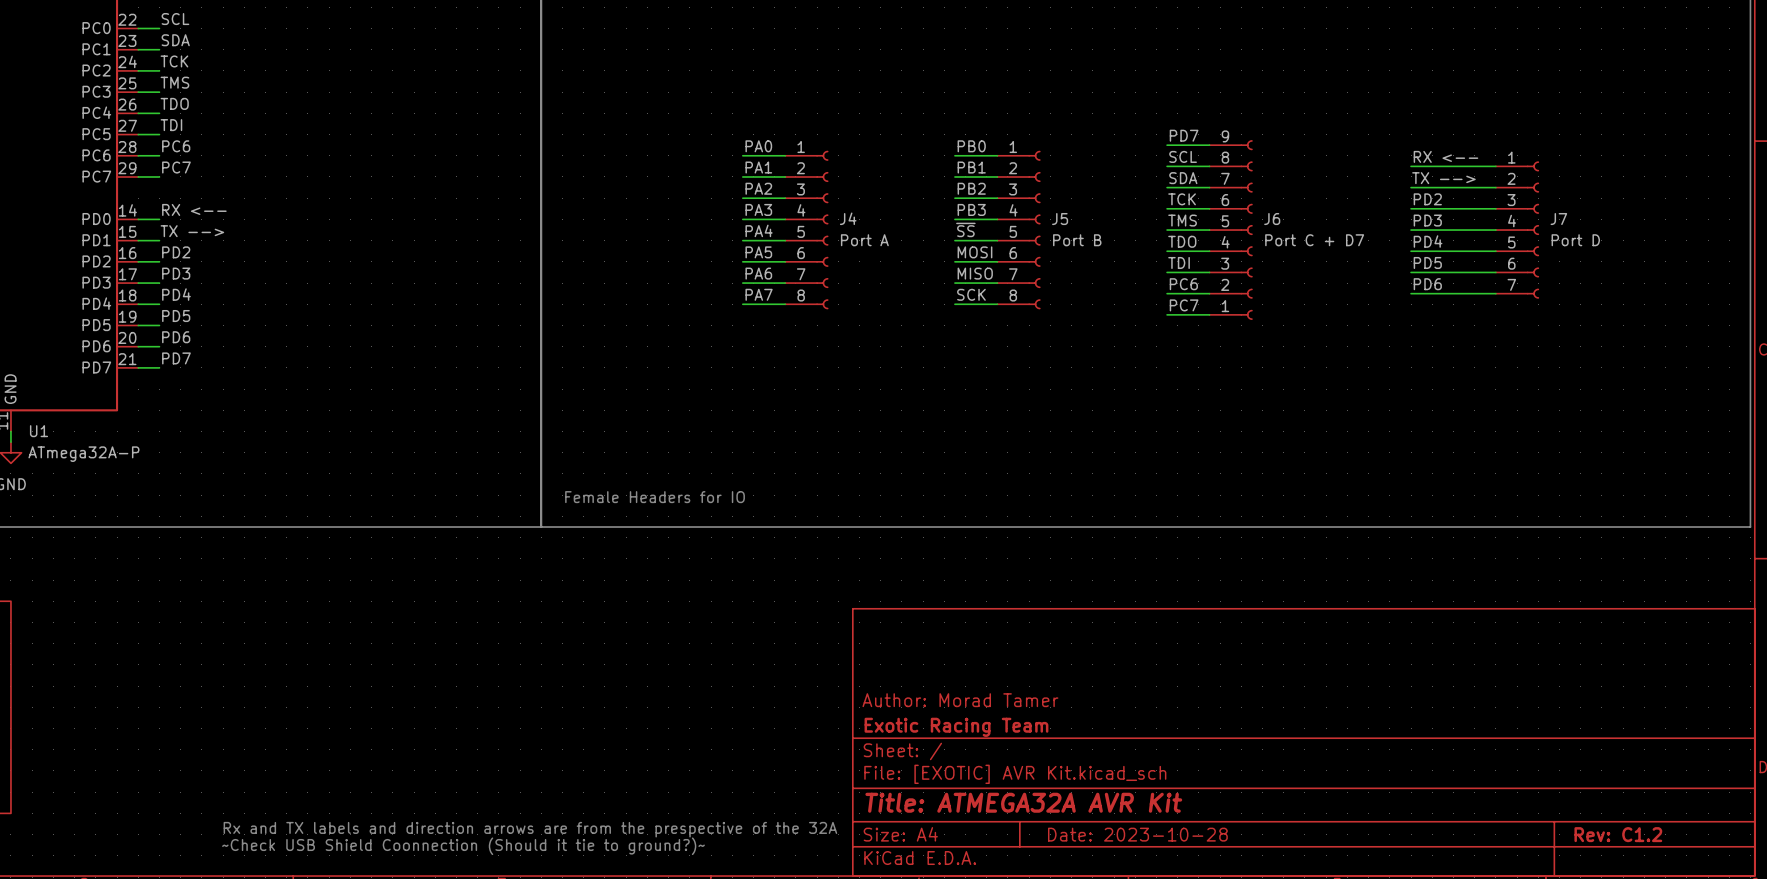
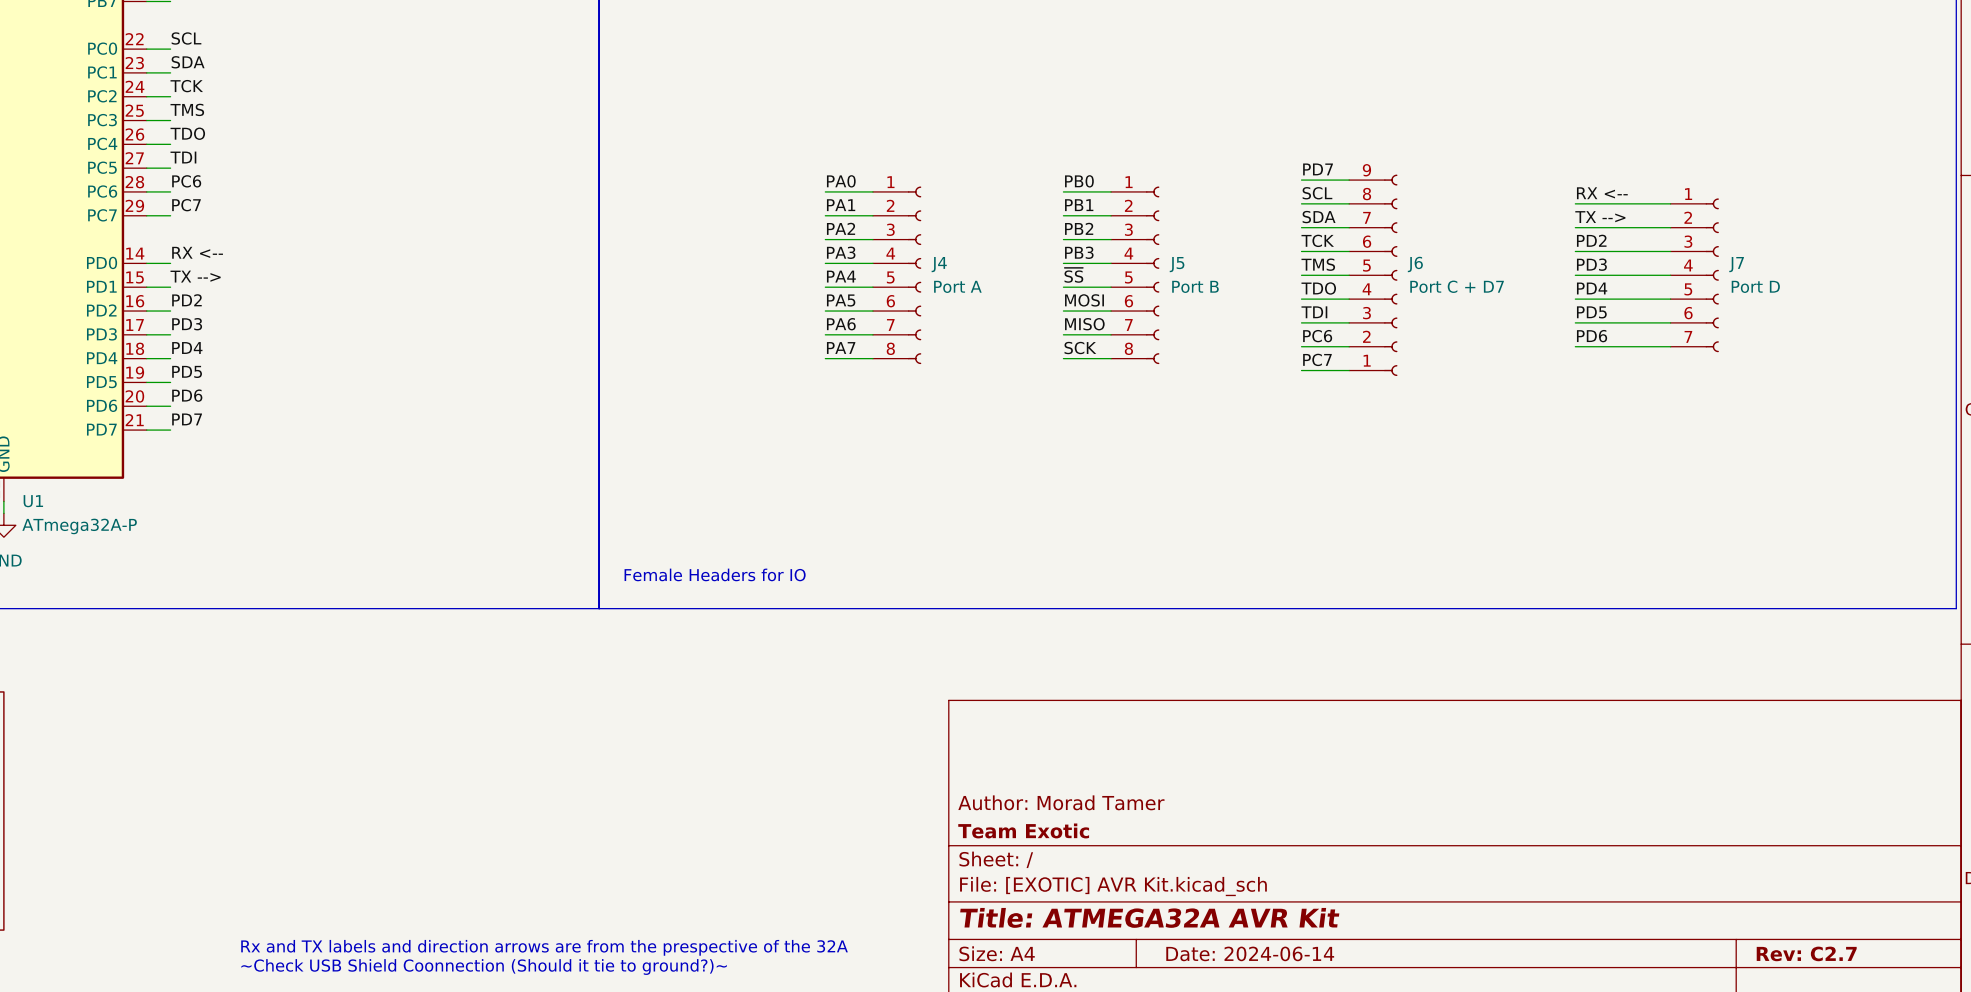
title block: Exotic Racing Team (956, 727) -> Team Exotic (1023, 830)
title block: Date: 2023-10-28 (1137, 834) -> Date: 2024-06-14 (1250, 953)
title block: Rev: C1.2 (1618, 834) -> Rev: C2.7 (1806, 953)

